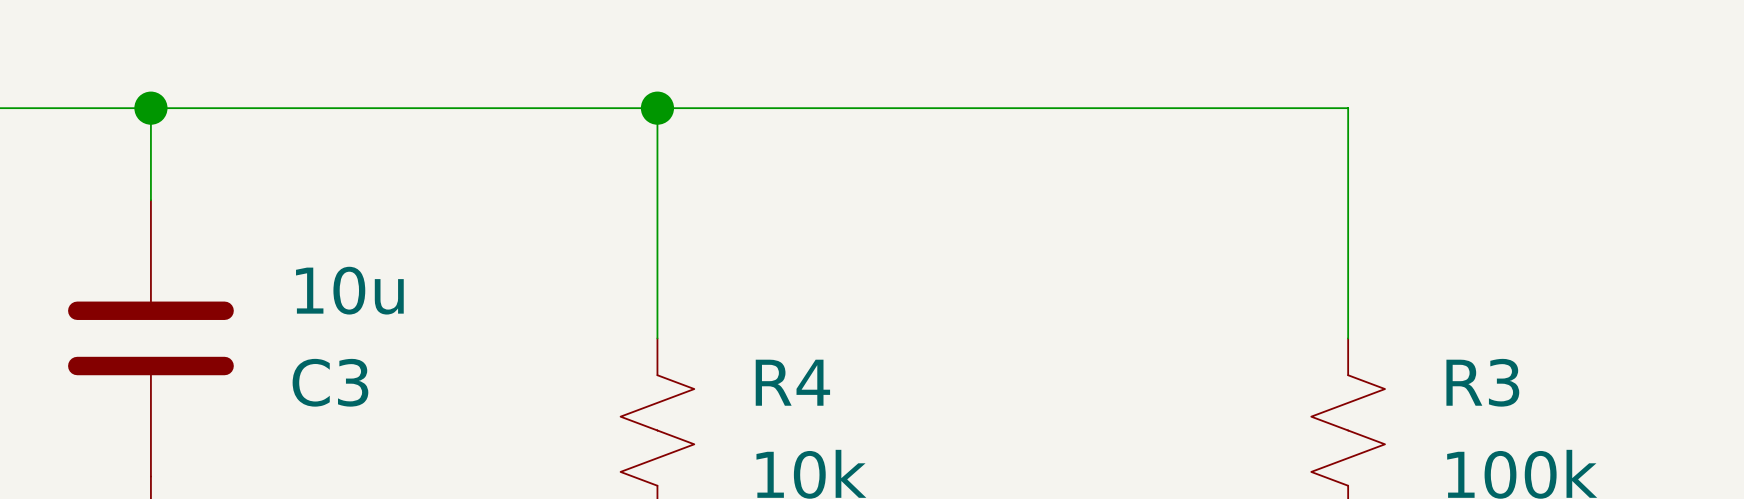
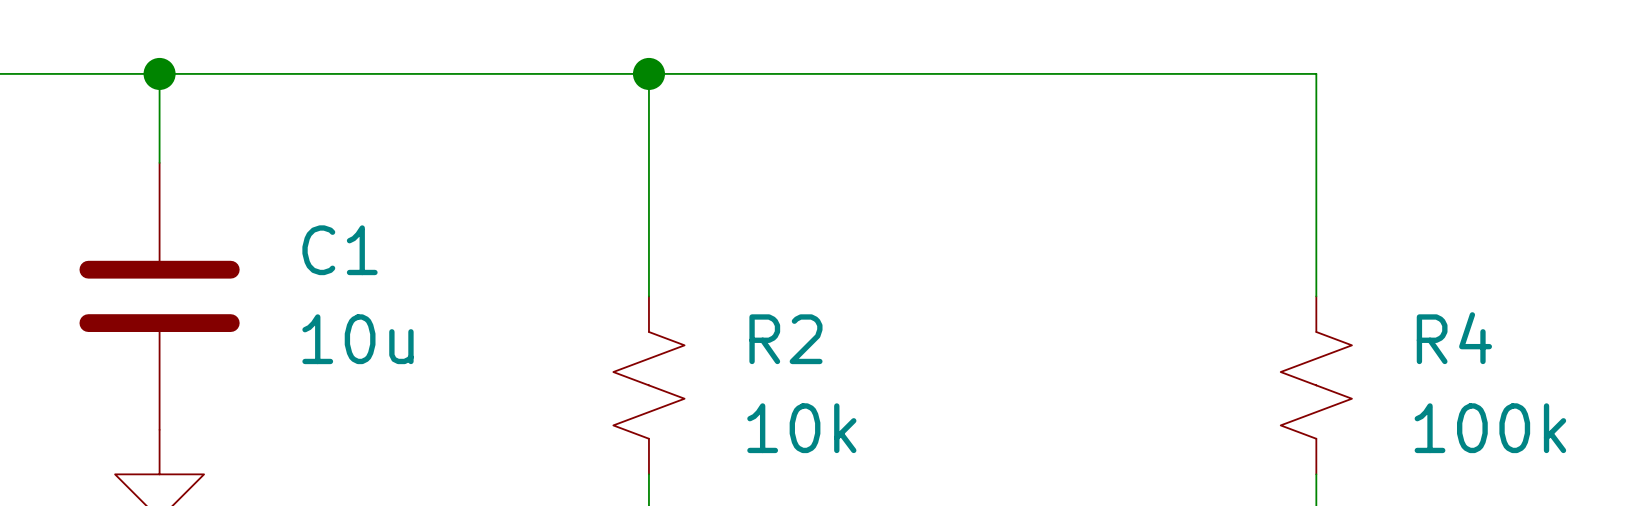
10u name: 10u (349, 290) -> C1 (339, 250)
10u value: C3 (330, 382) -> 10u (358, 339)
R4 name: R4 (792, 382) -> R2 (785, 339)
R3 name: R3 (1482, 382) -> R4 (1454, 338)

